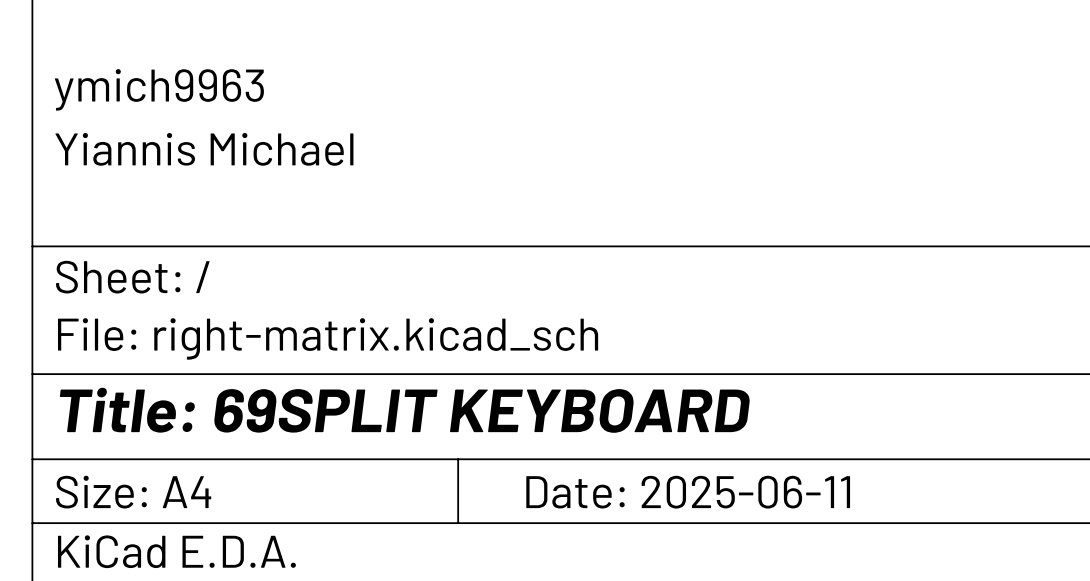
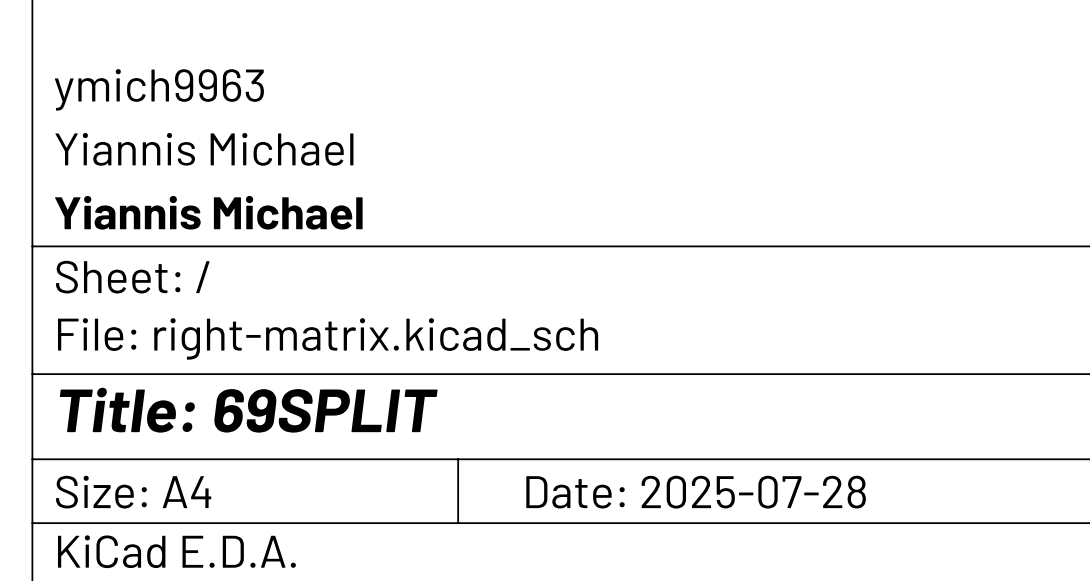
title block: none -> Yiannis Michael (208, 212)
title block: Title: 69SPLIT KEYBOARD (404, 410) -> Title: 69SPLIT (248, 410)
title block: Date: 2025-06-11 (688, 492) -> Date: 2025-07-28 (696, 492)

